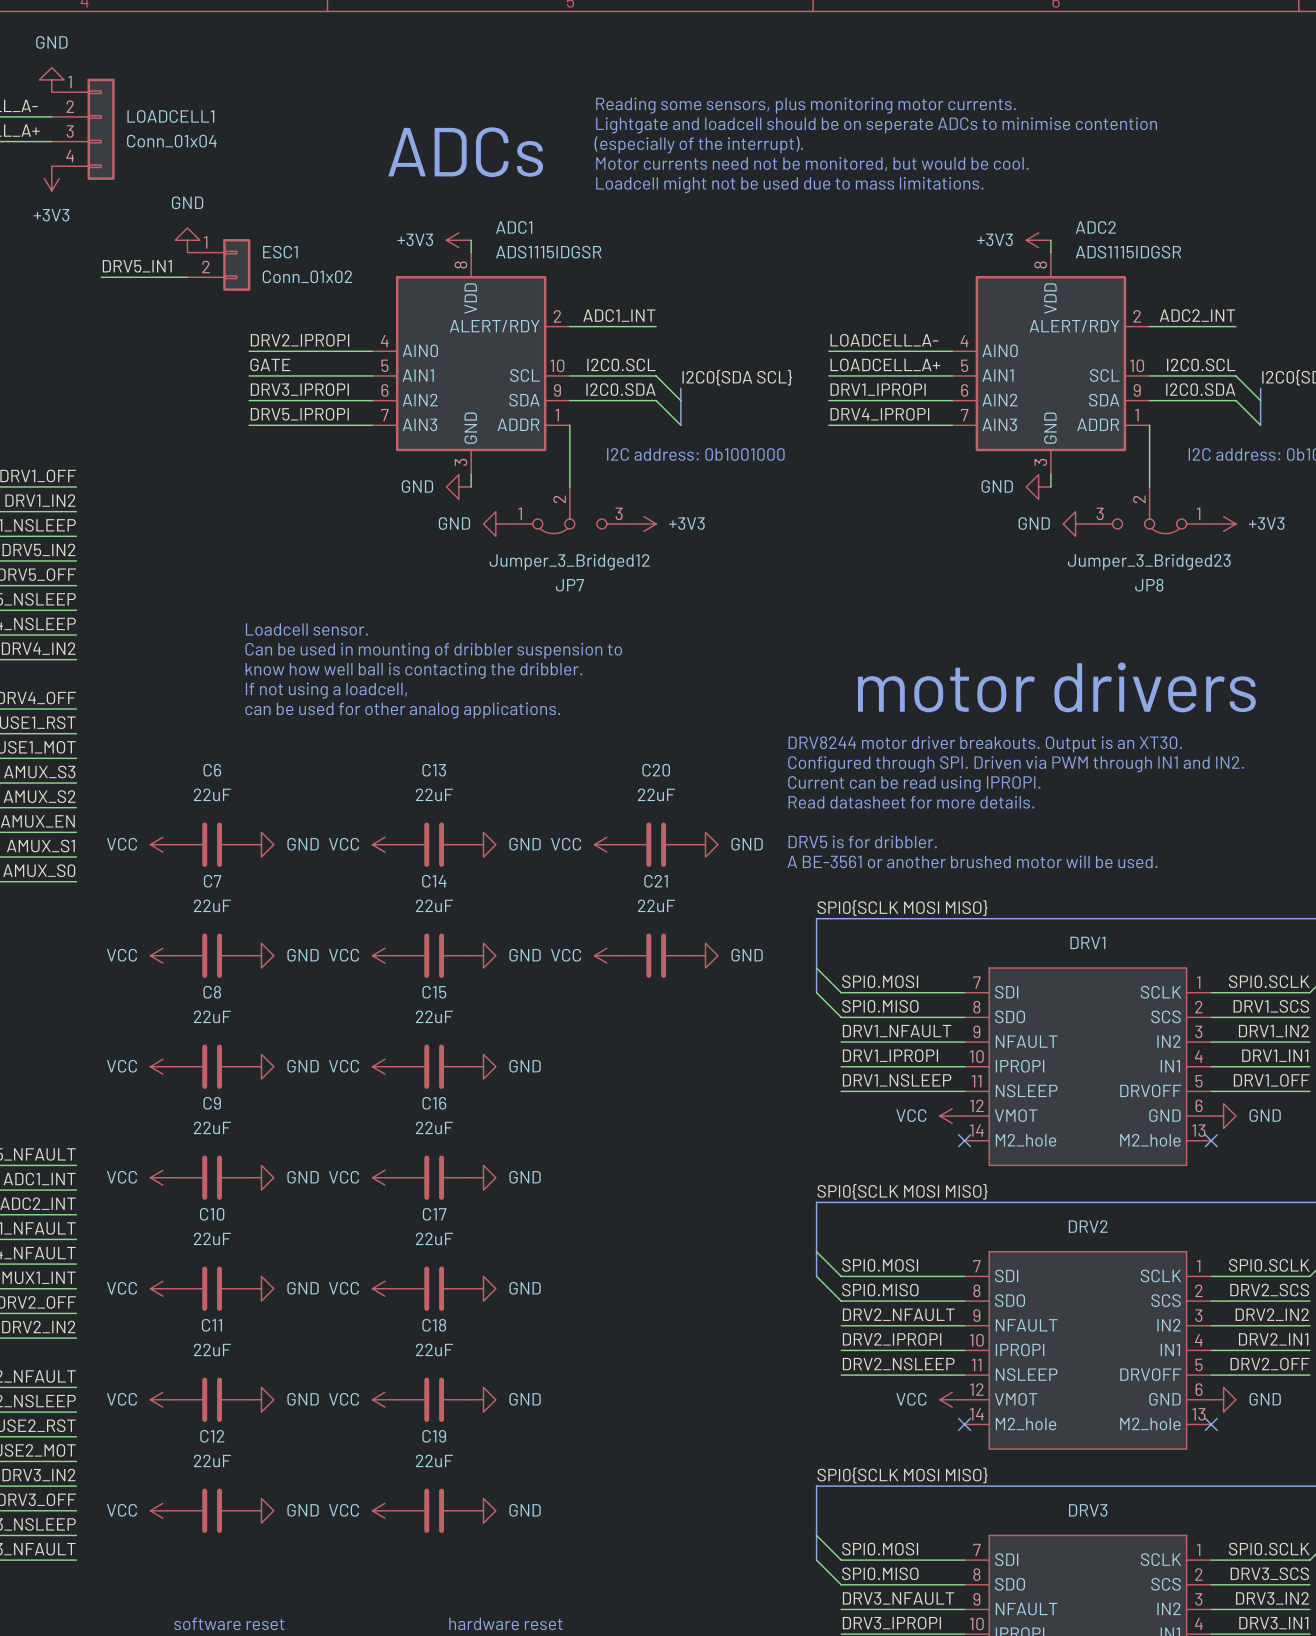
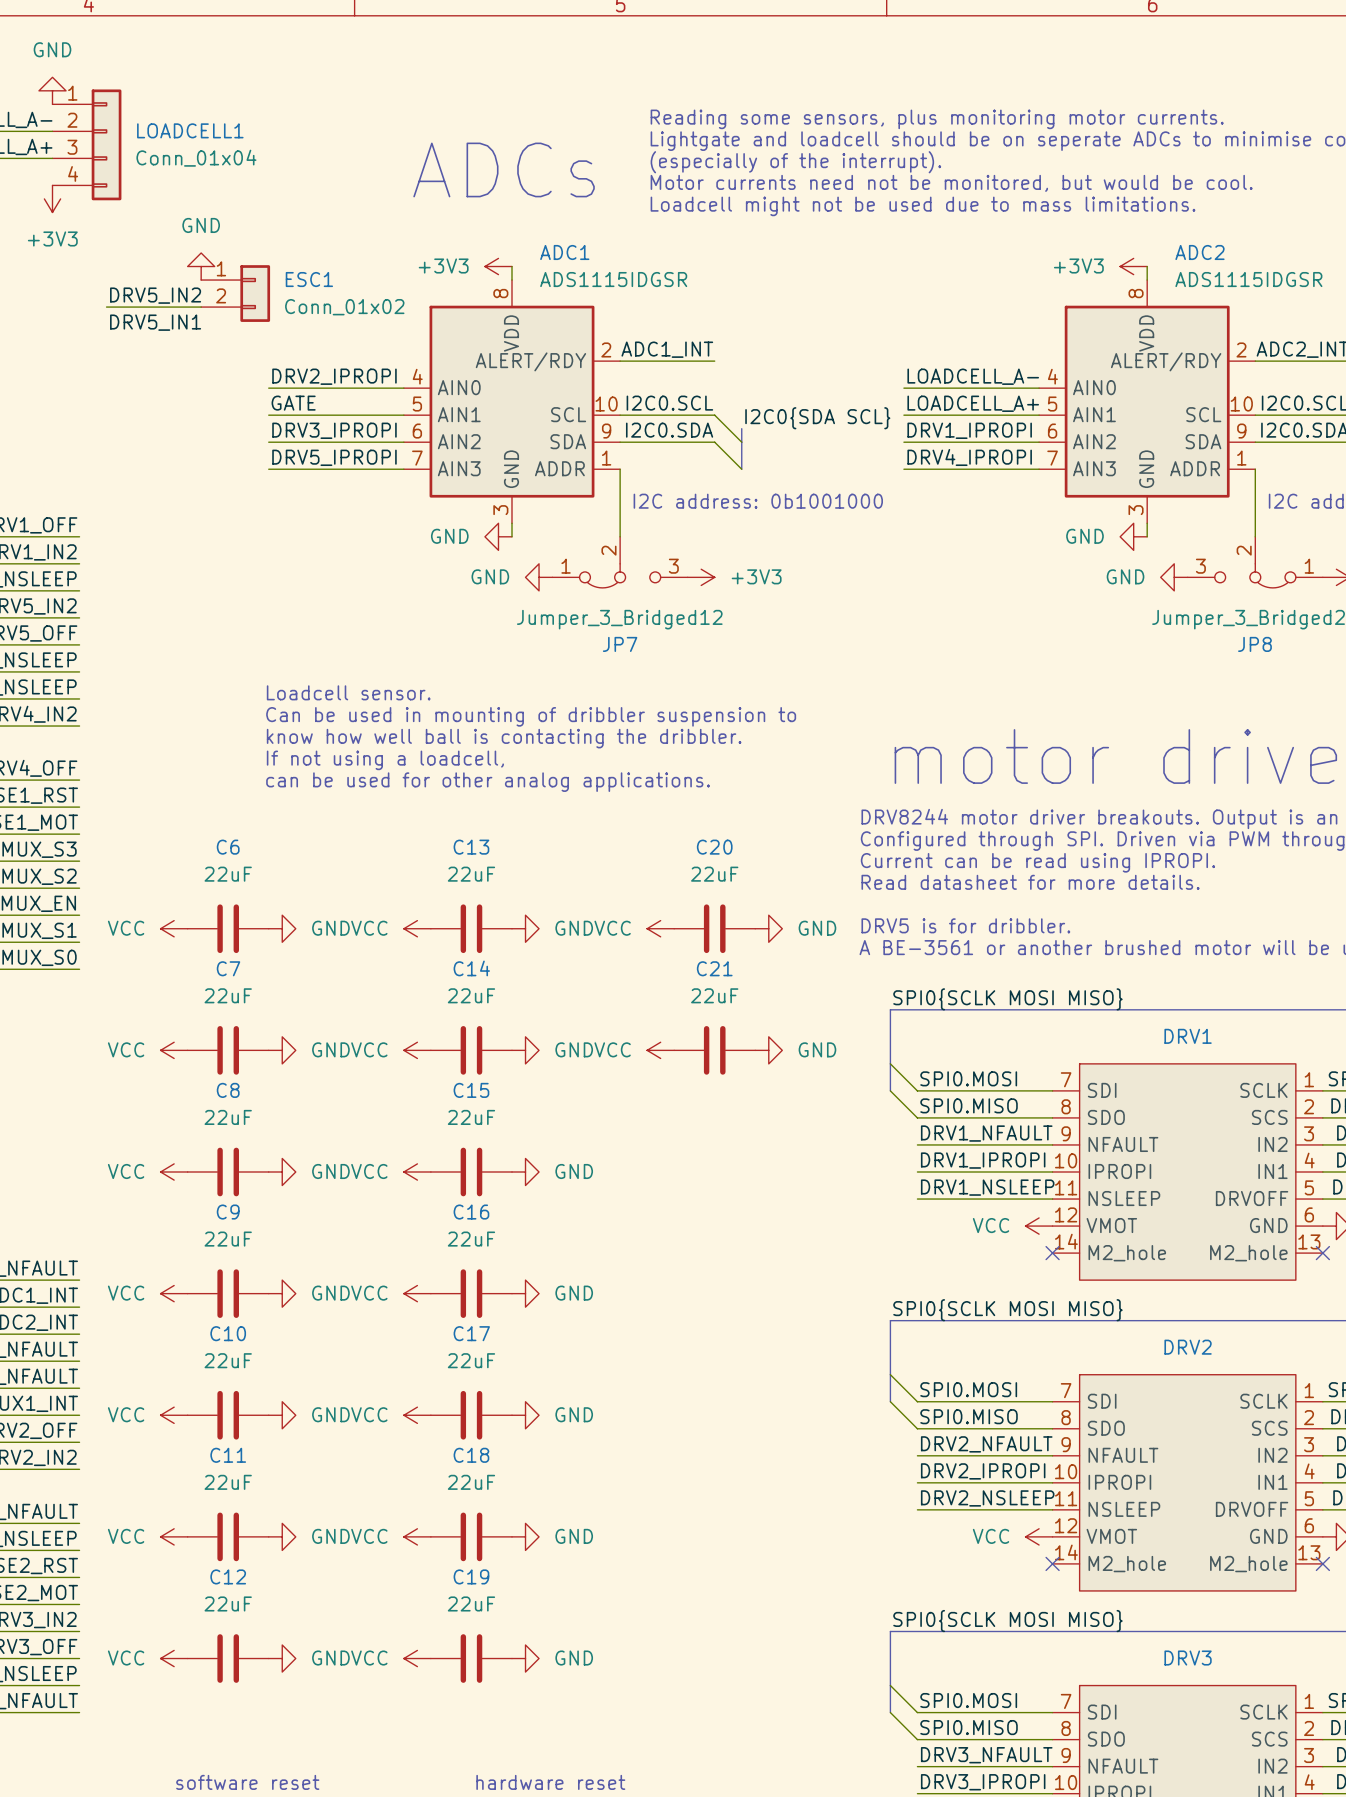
label: DRV5_IN1 (137, 266) -> DRV5_IN2 (155, 295)
label: none -> DRV5_IN1 (155, 322)

